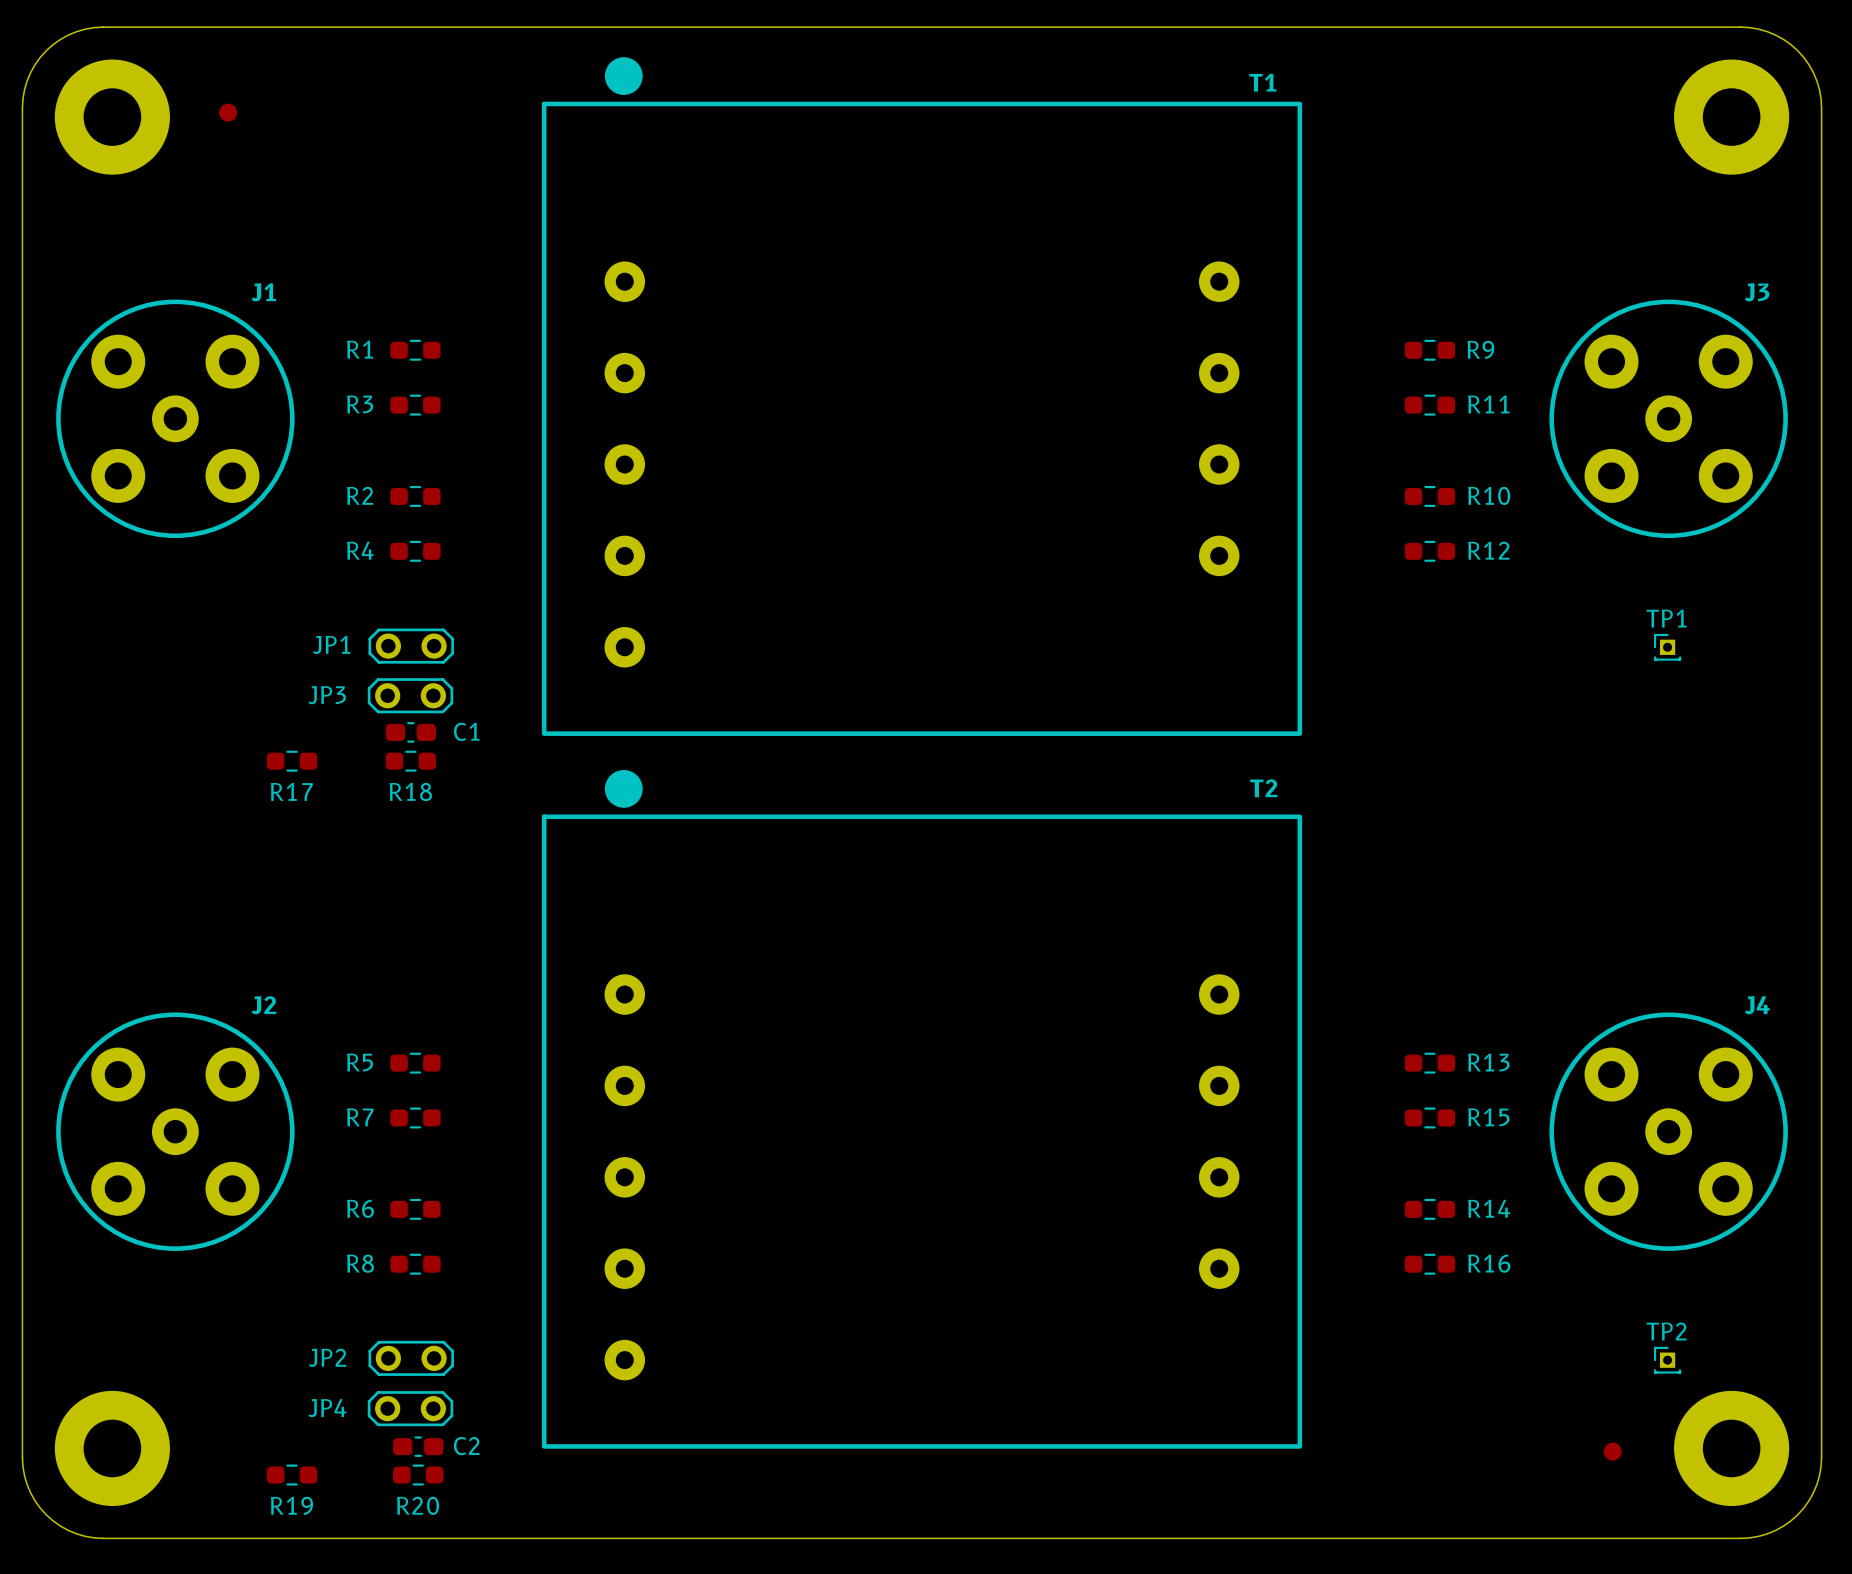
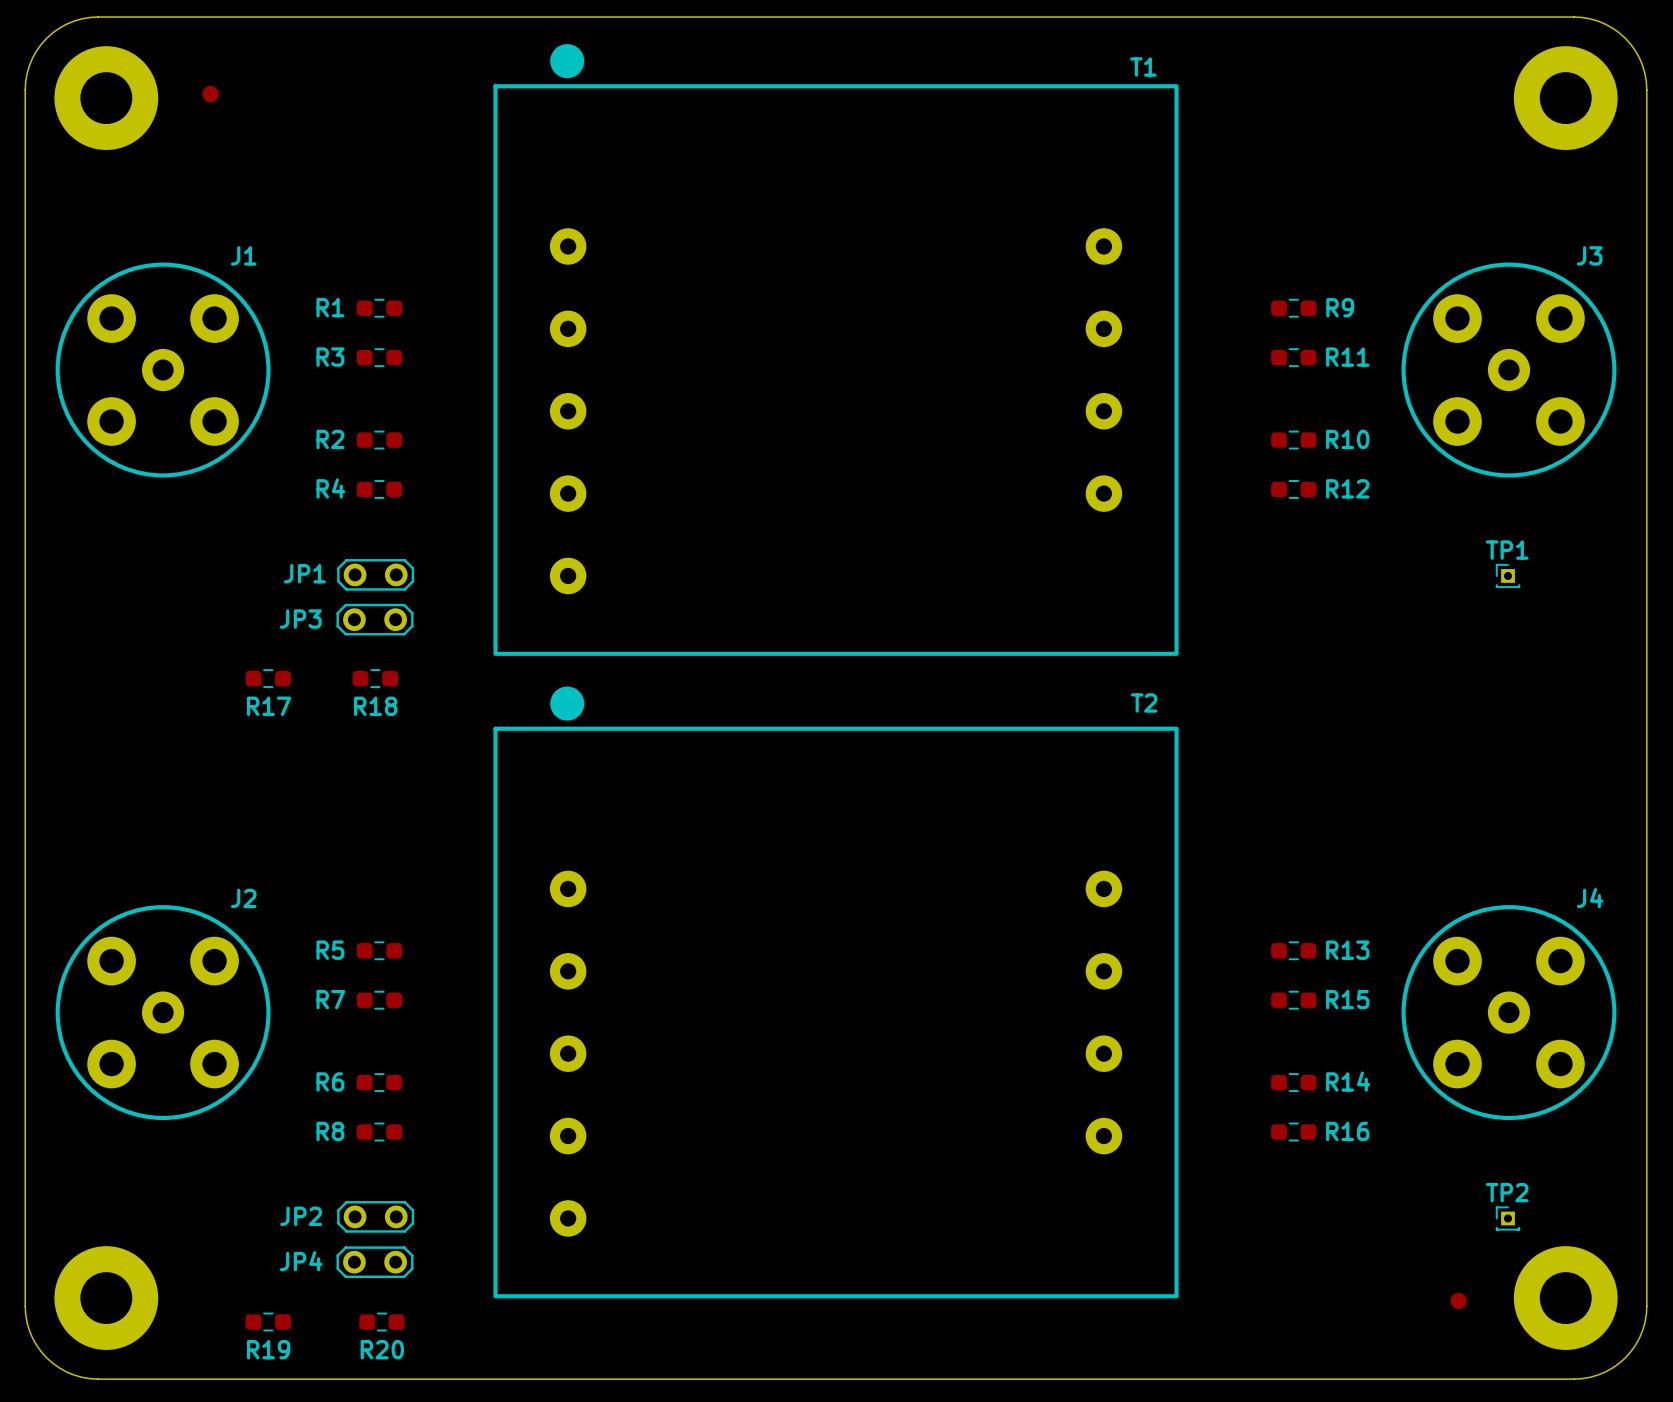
C1: (410, 732) -> none
C2: (418, 1446) -> none

